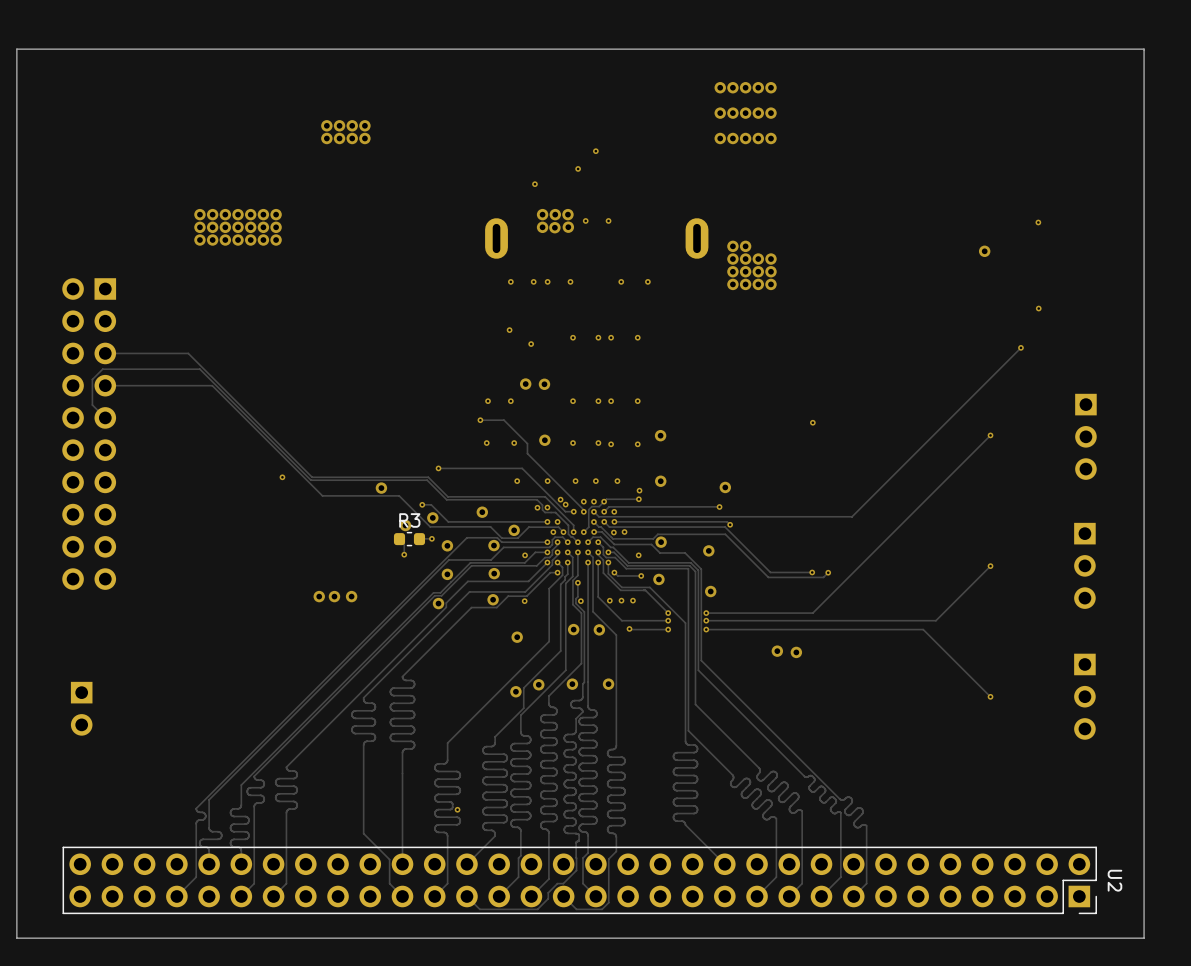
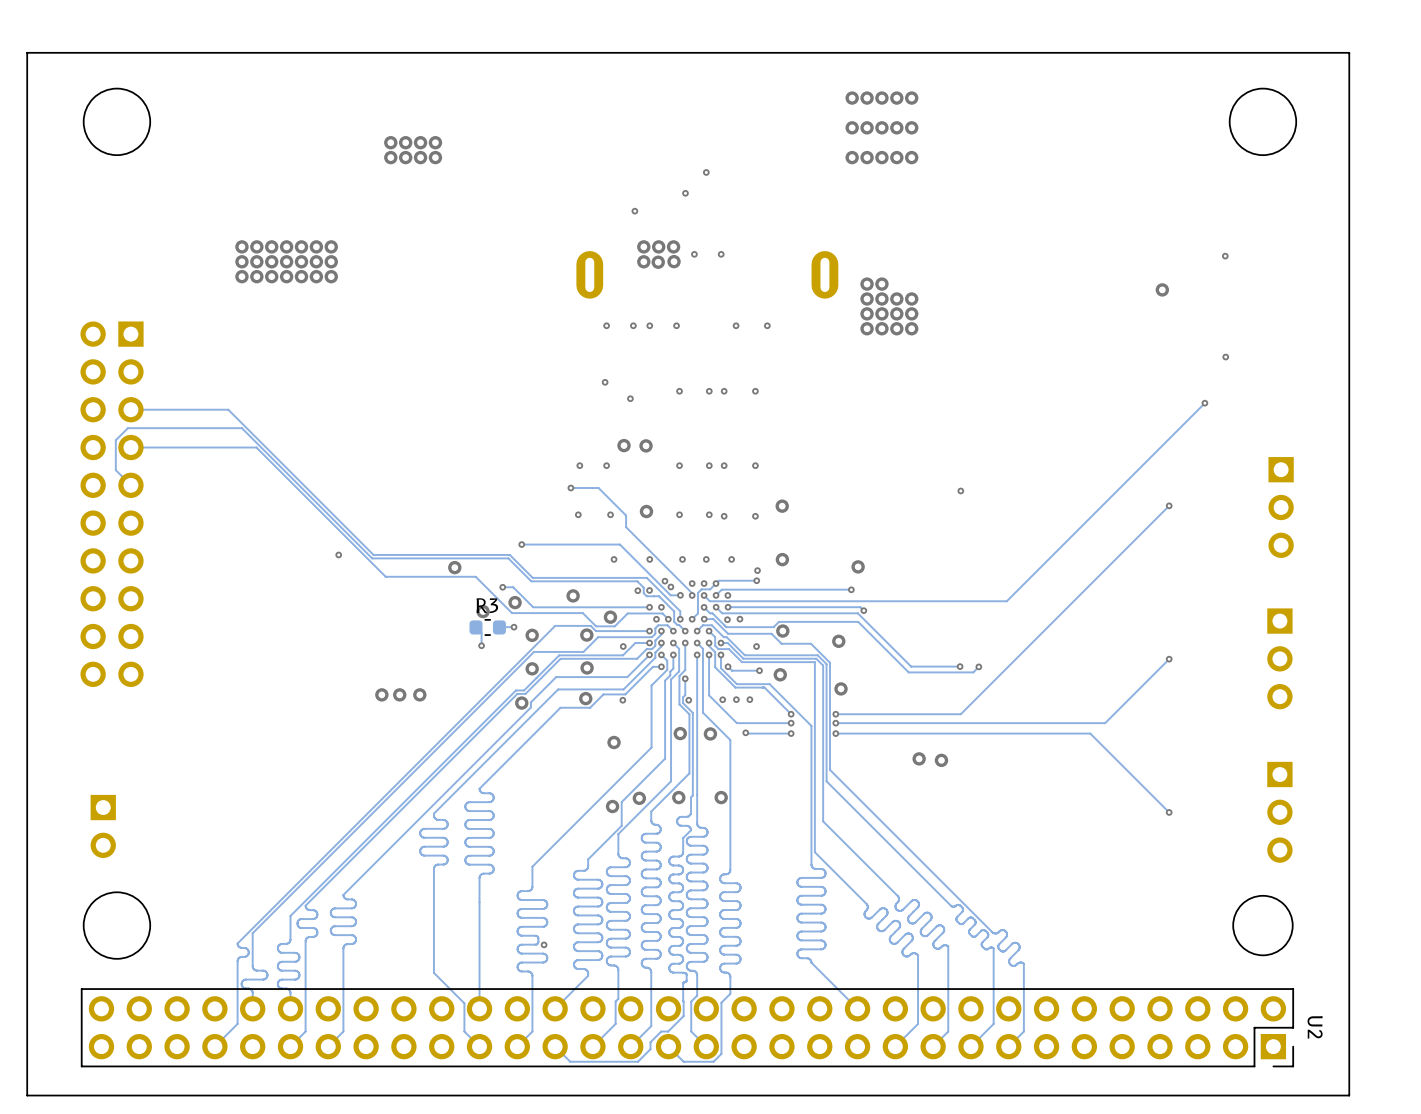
round board edge: none -> [83, 88, 151, 156]
round board edge: none -> [1229, 88, 1297, 156]
round board edge: none -> [83, 891, 151, 960]
round board edge: none -> [1232, 895, 1294, 956]

